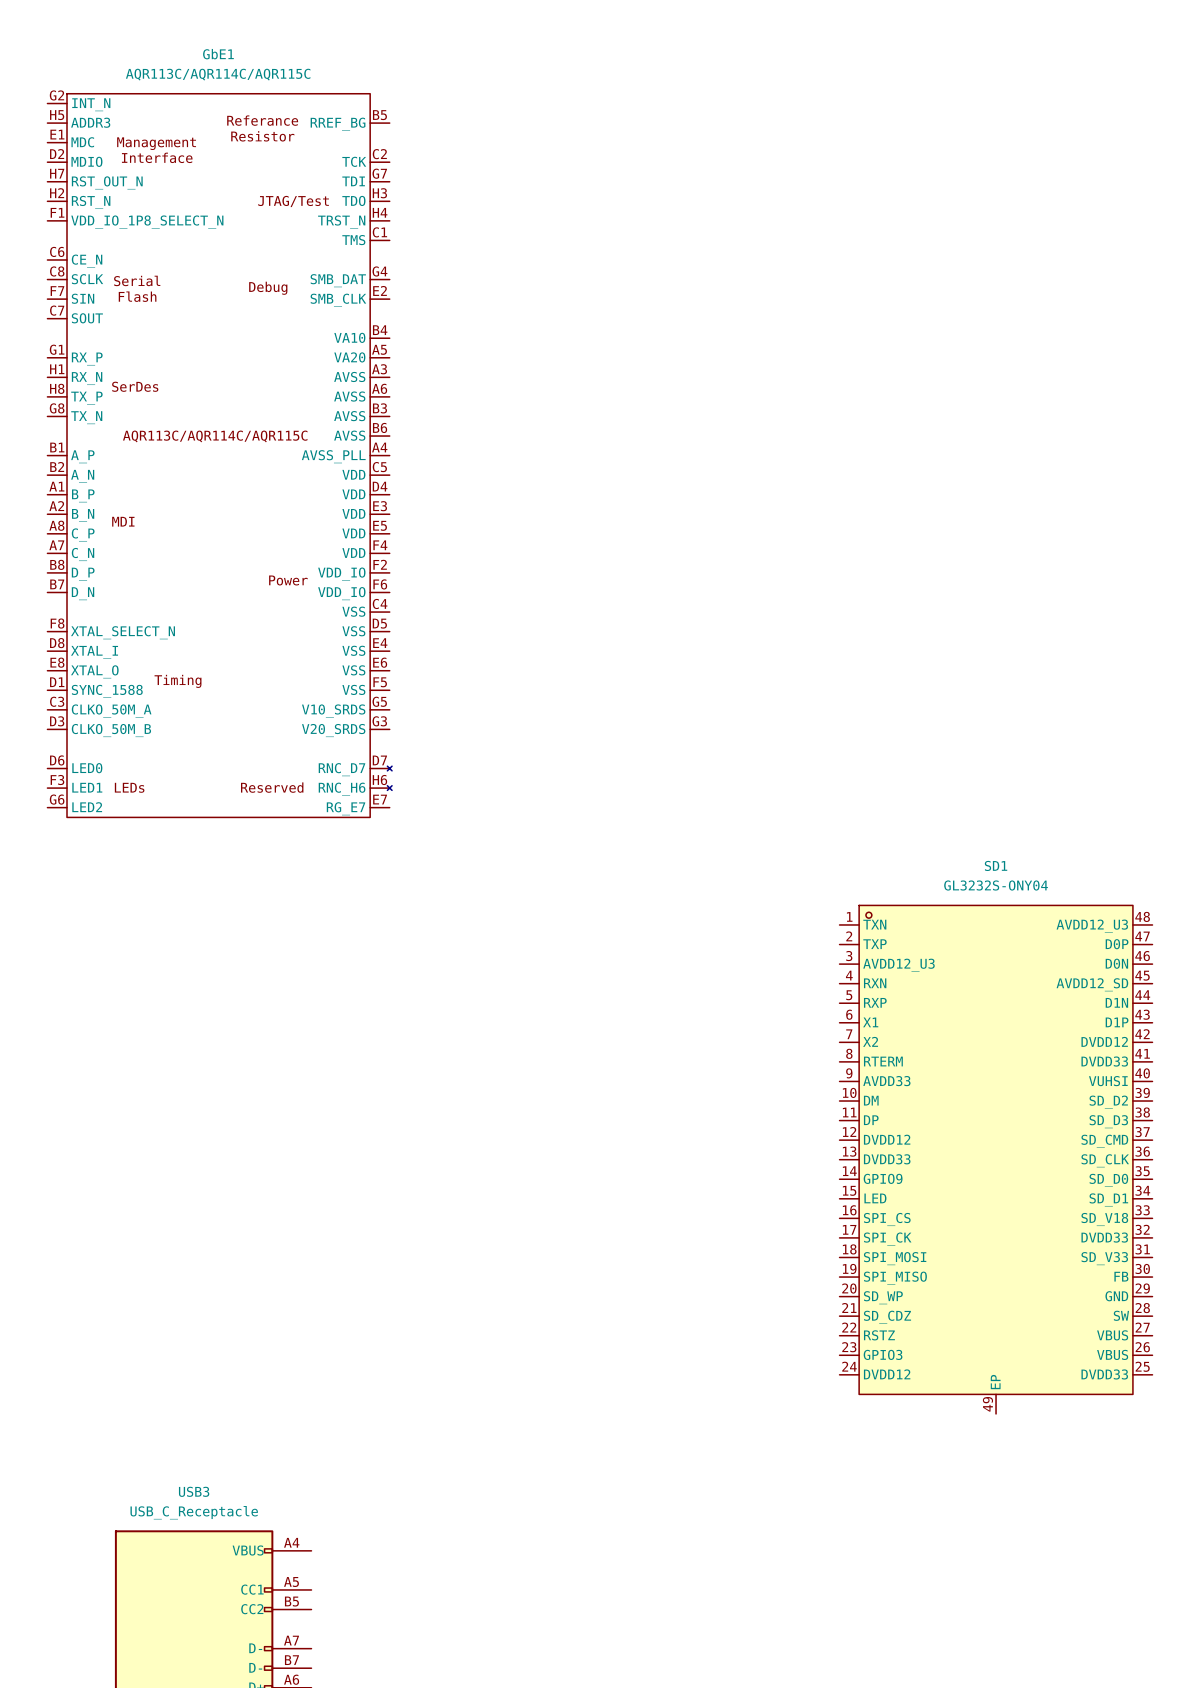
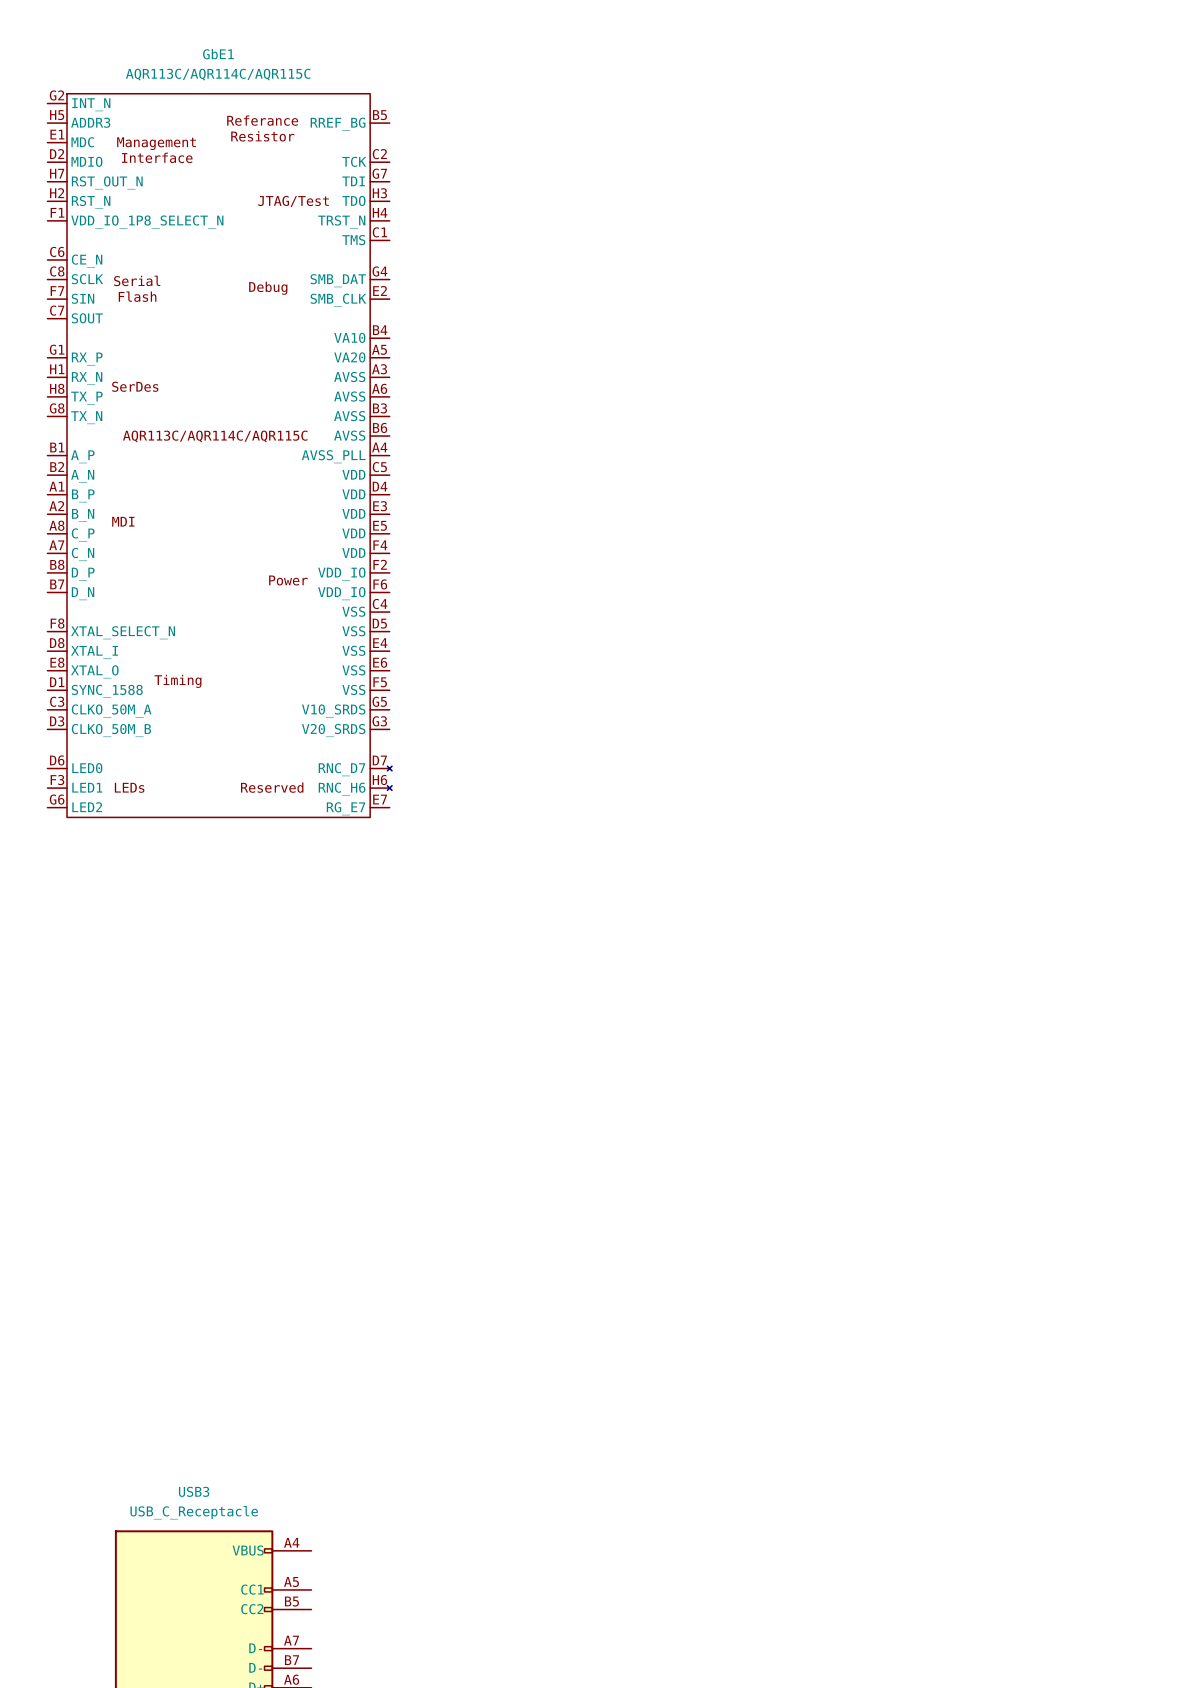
SD1: GL3232S-ONY04 (996, 1159) -> none

